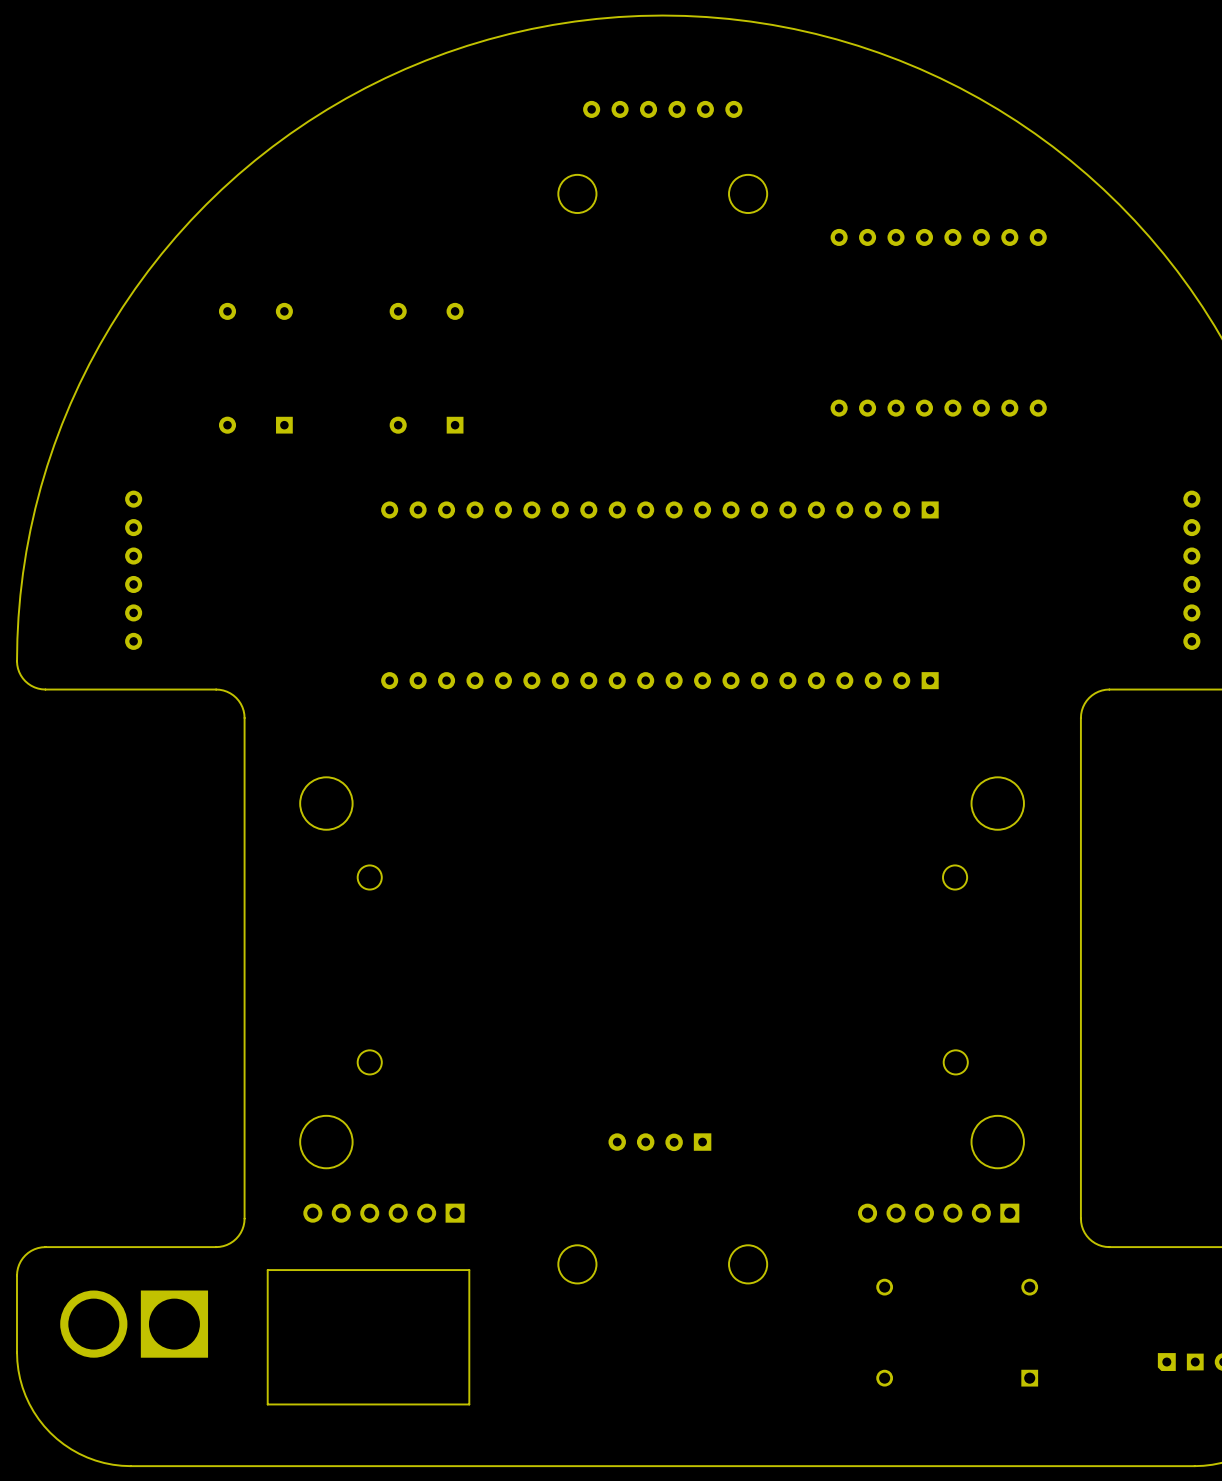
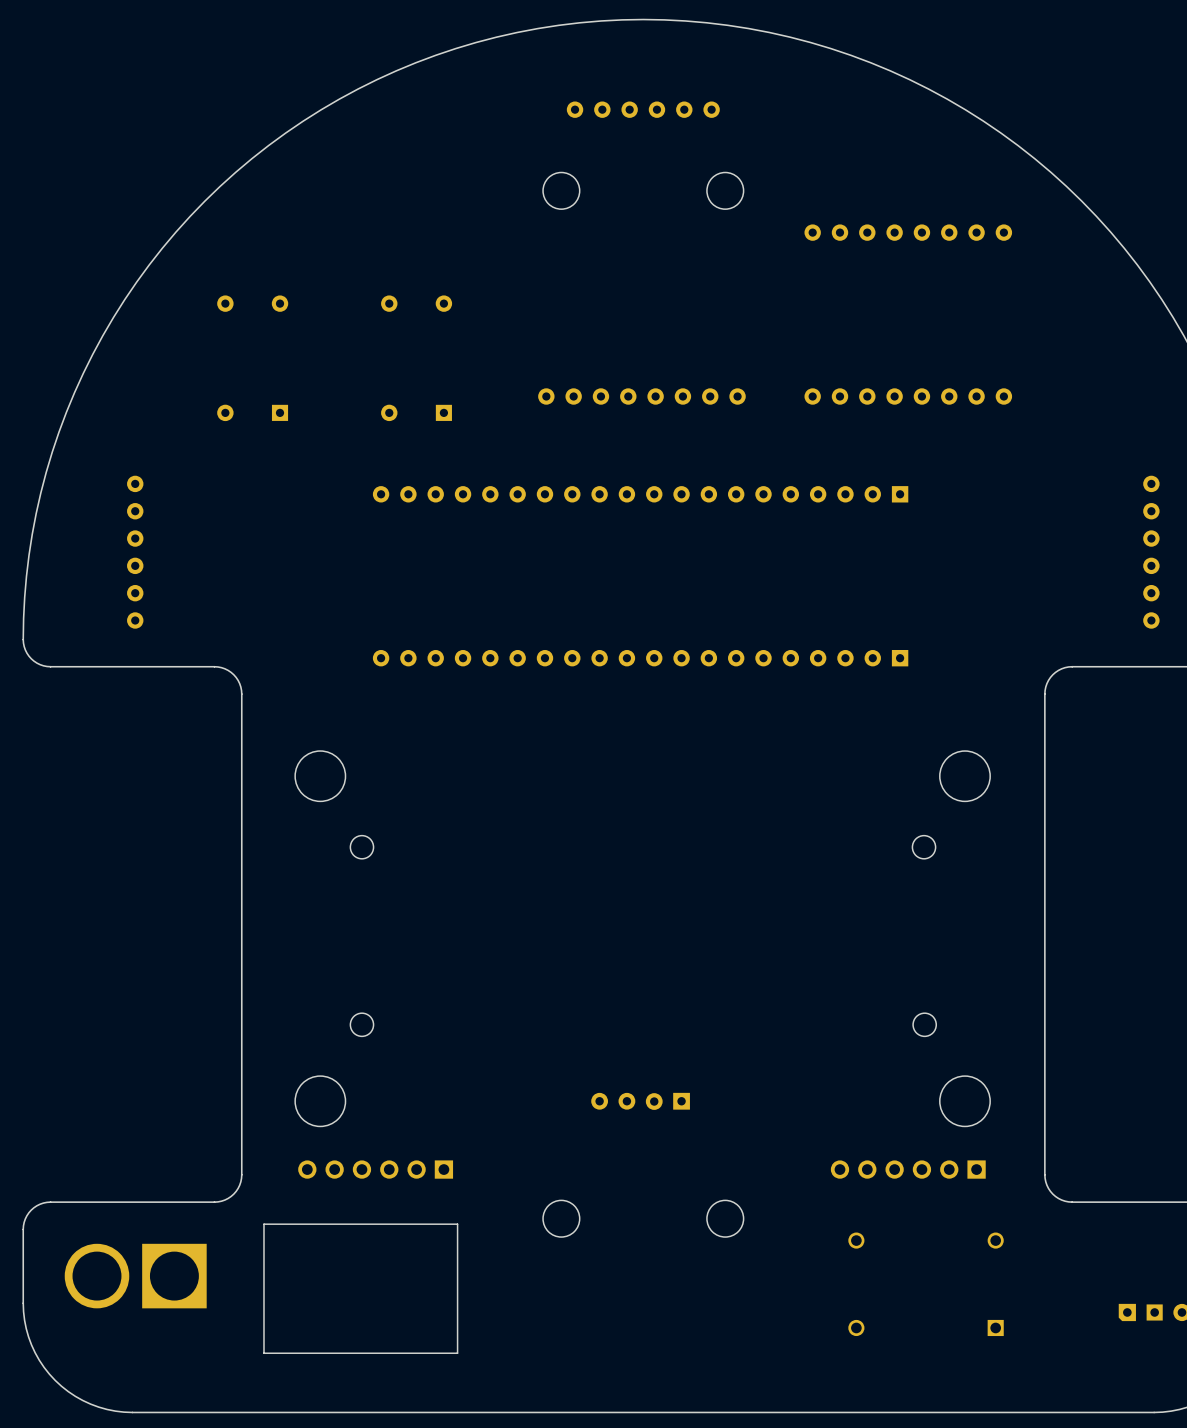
part: none -> (641, 396)

